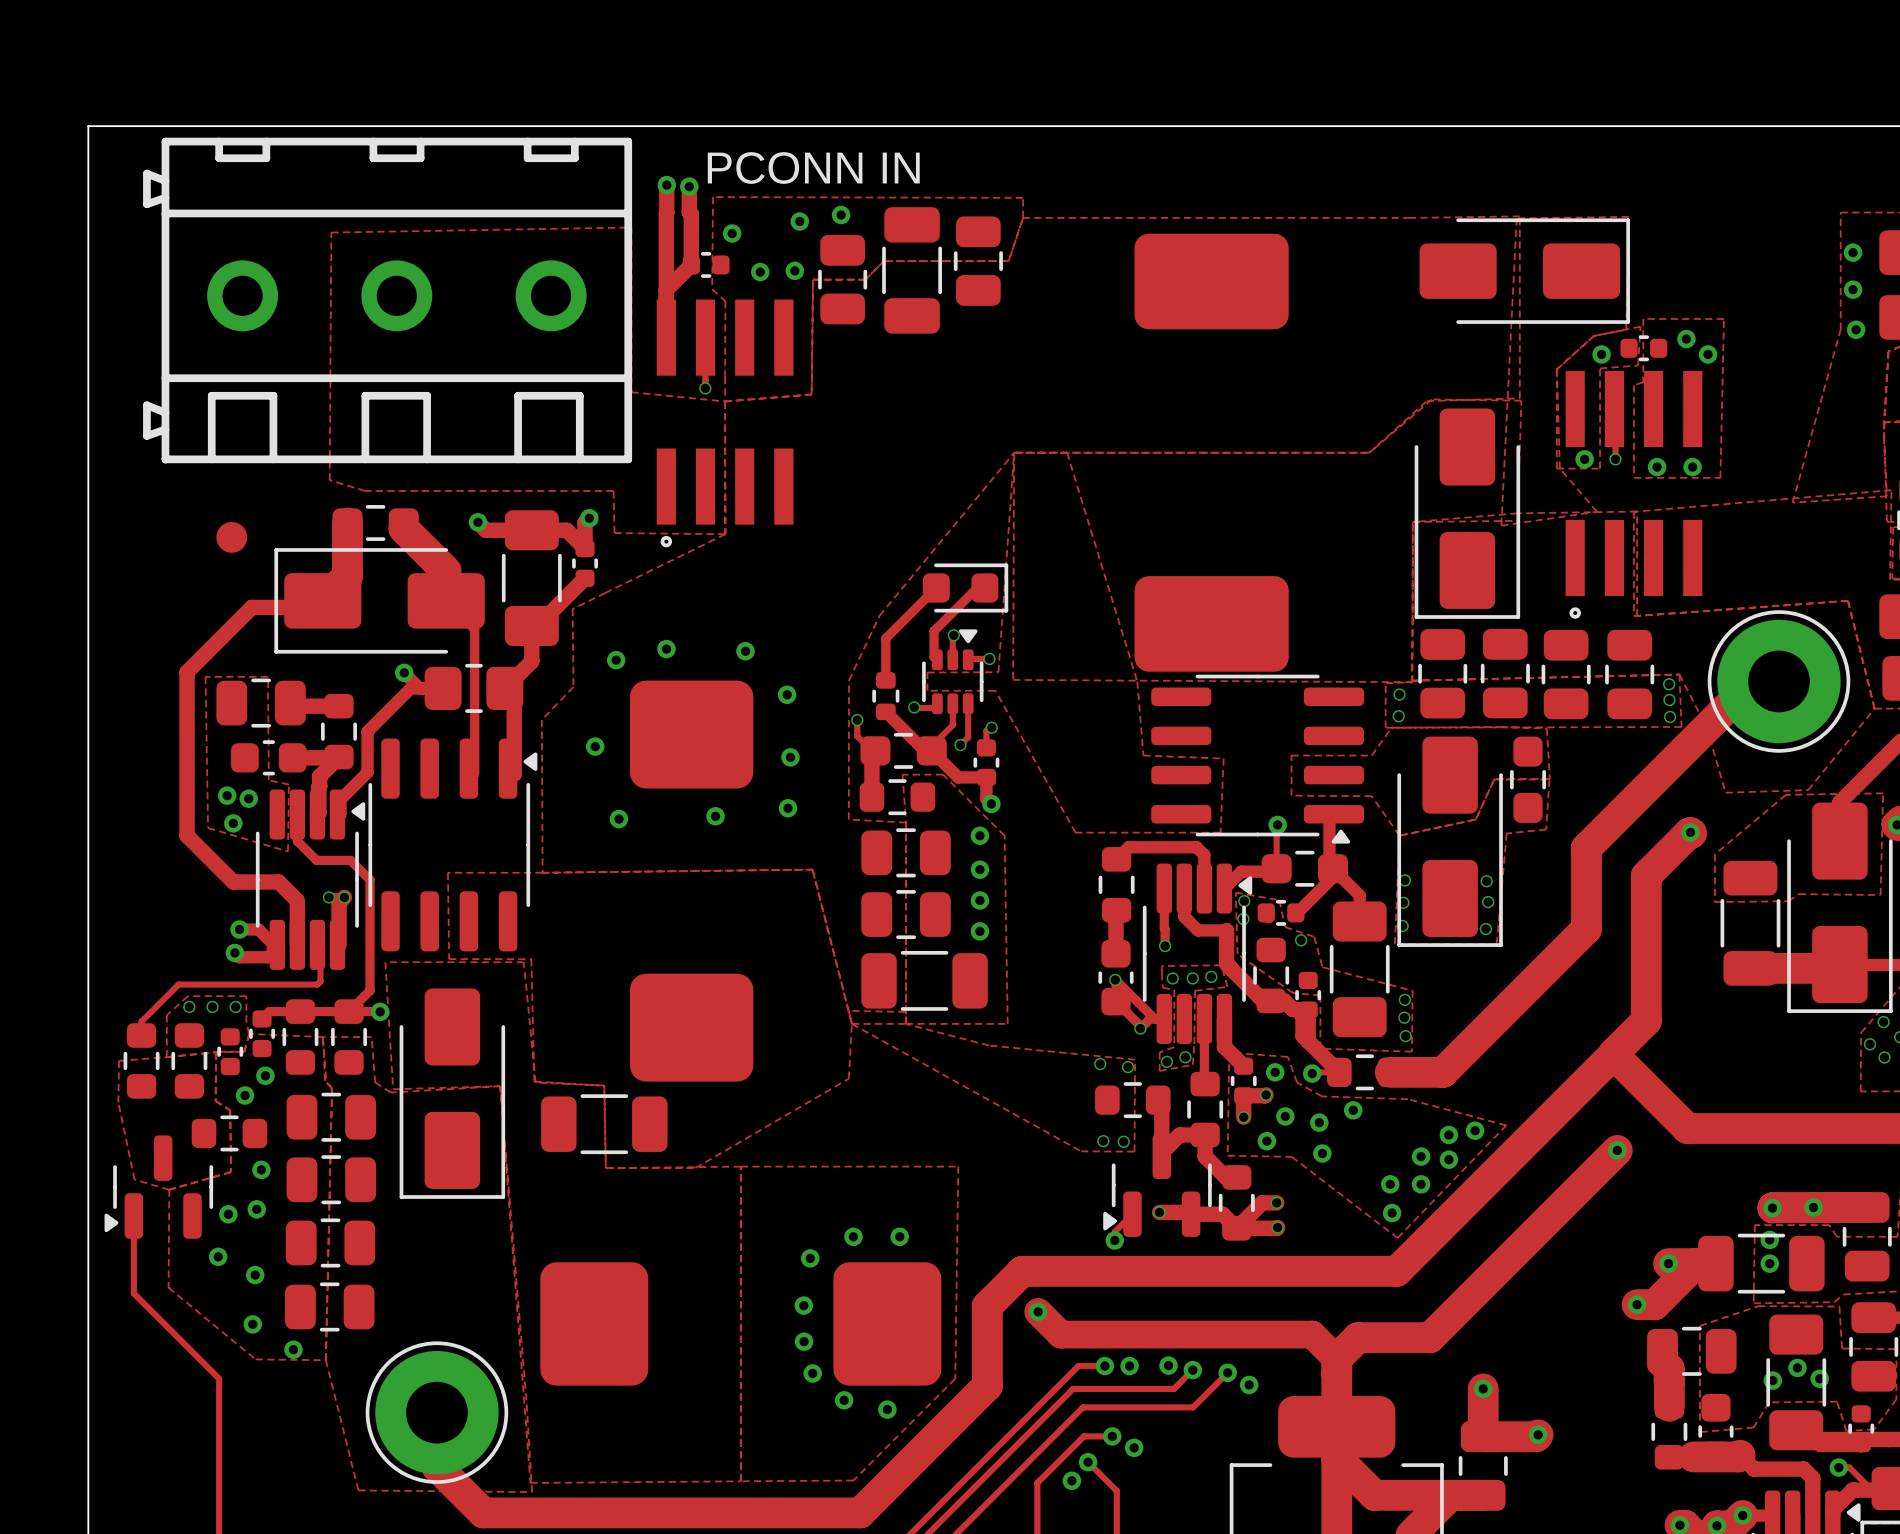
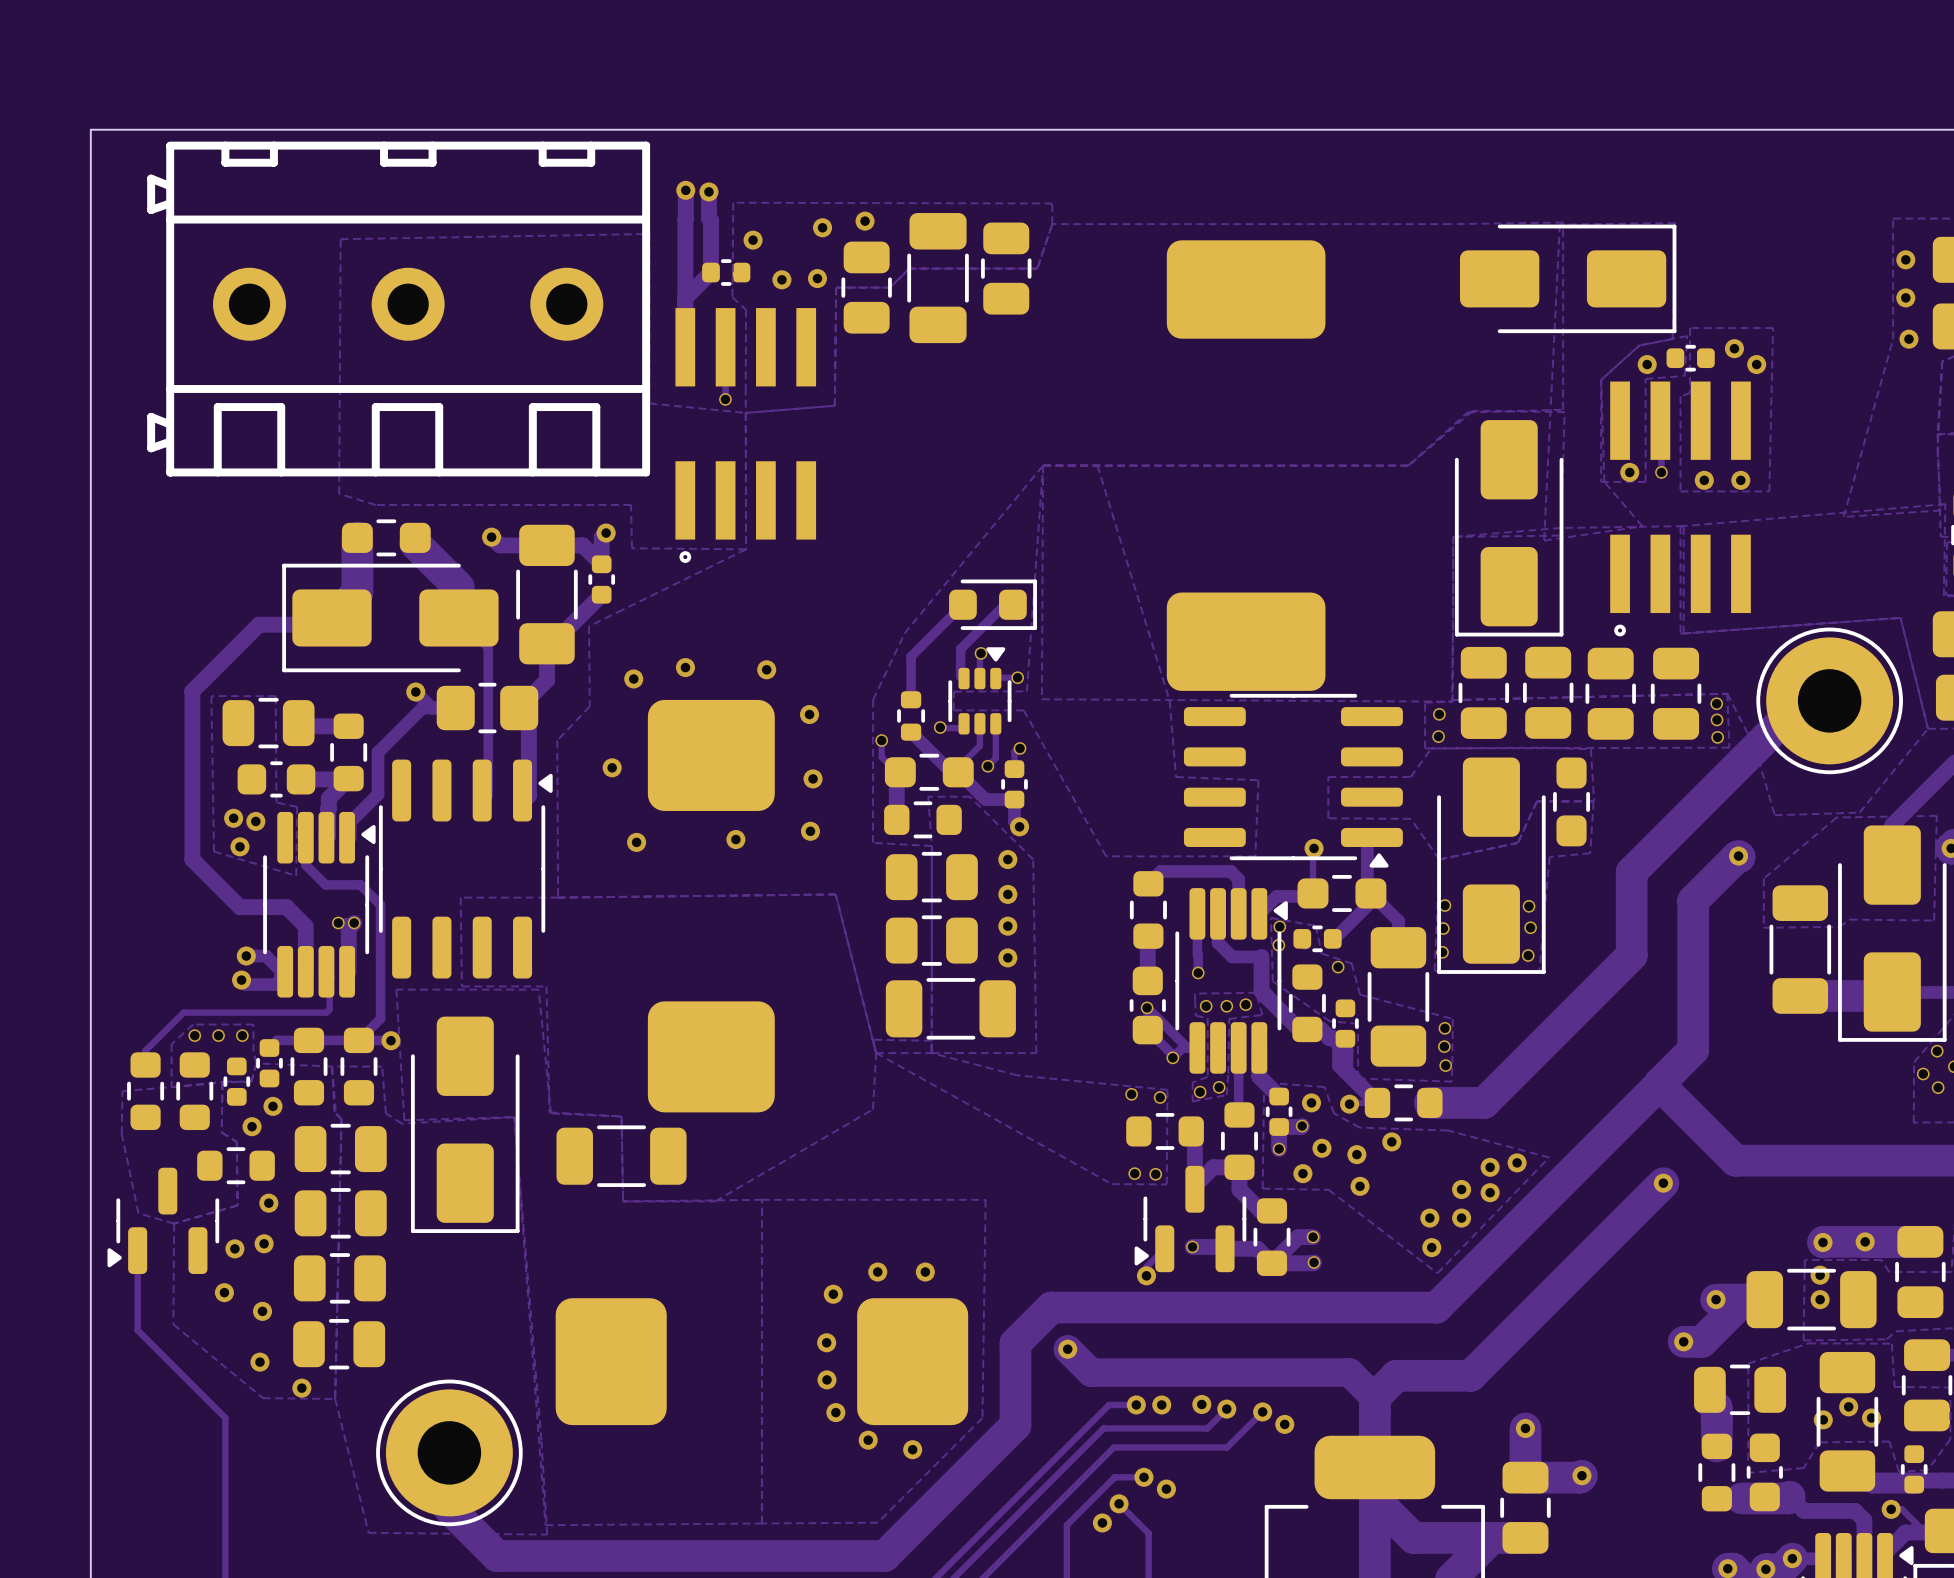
text: PCONN IN (813, 168) -> none
part: (231, 537) -> none

